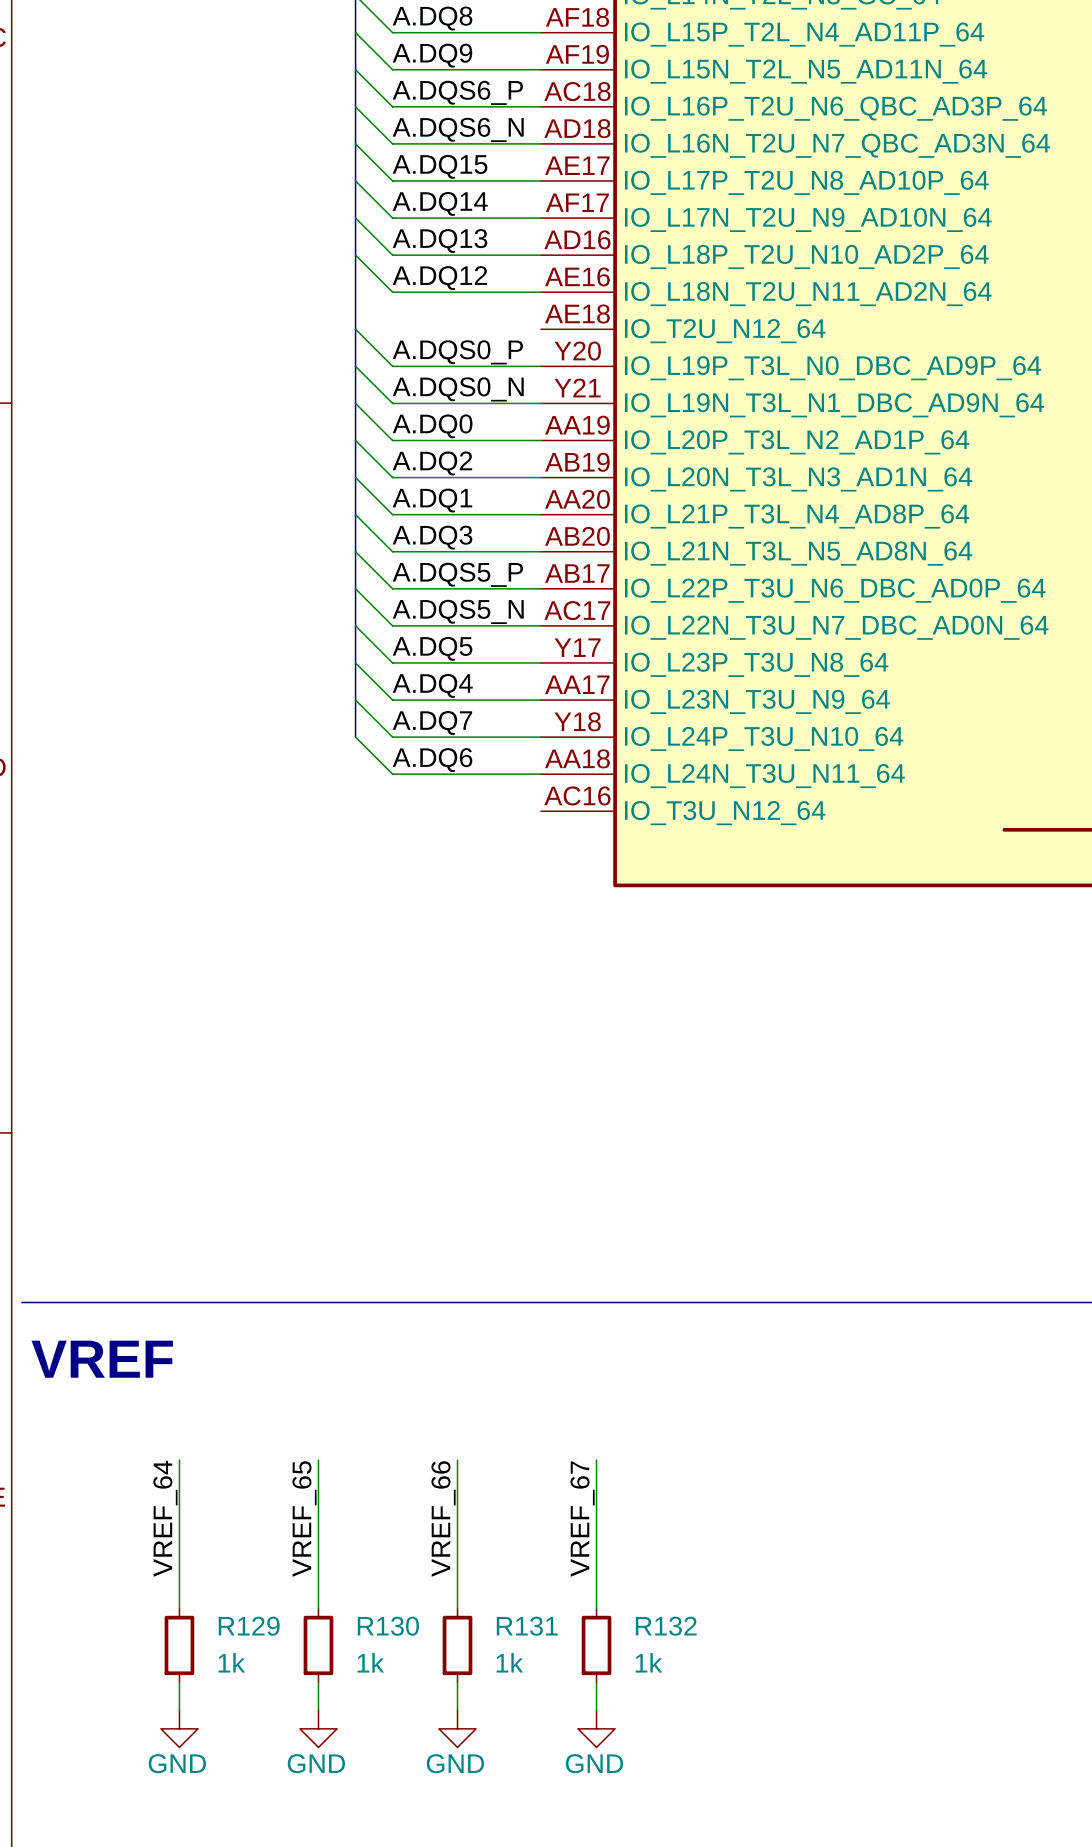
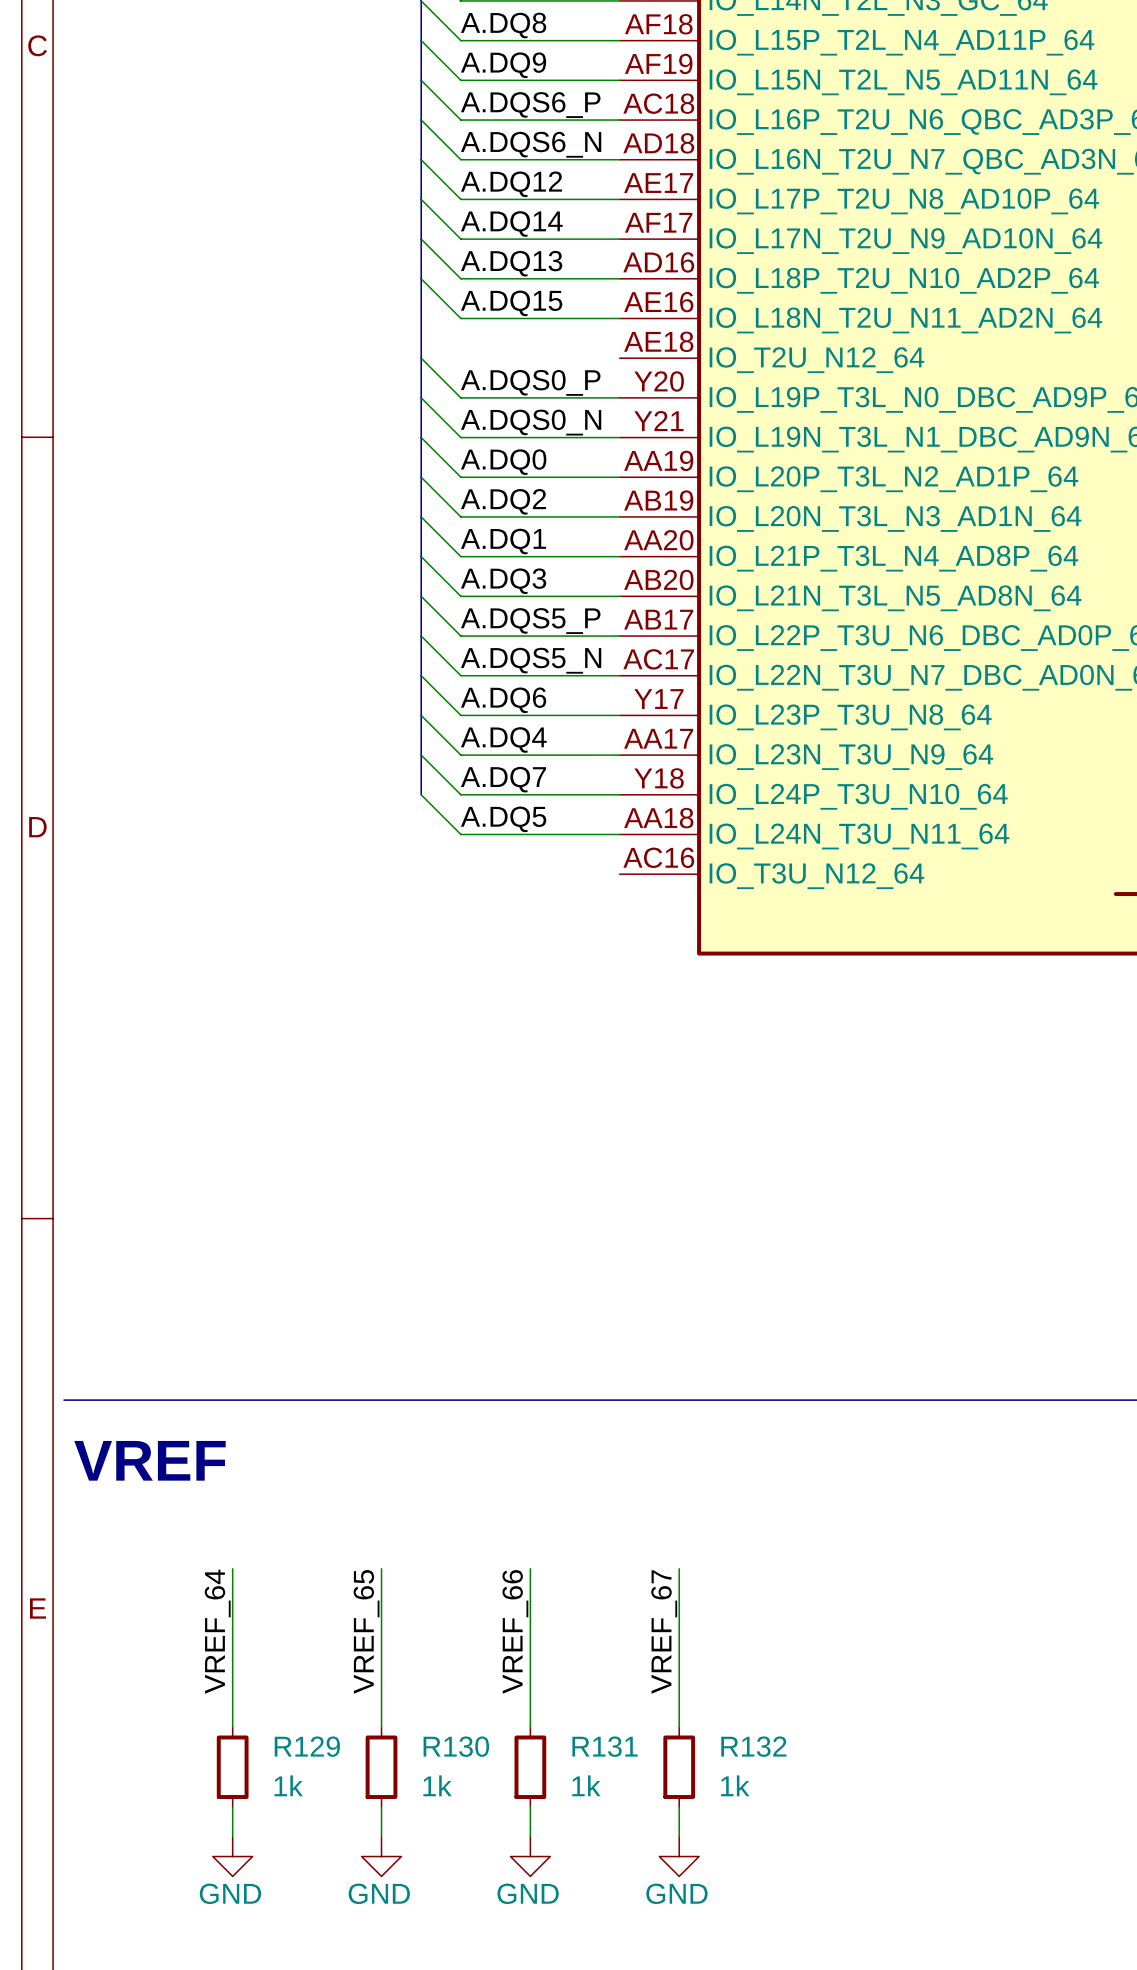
label: A.DQ15 (440, 166) -> A.DQ12 (511, 184)
label: A.DQ12 (439, 278) -> A.DQ15 (511, 303)
label: A.DQ5 (432, 648) -> A.DQ6 (503, 700)
label: A.DQ6 (432, 760) -> A.DQ5 (503, 819)

